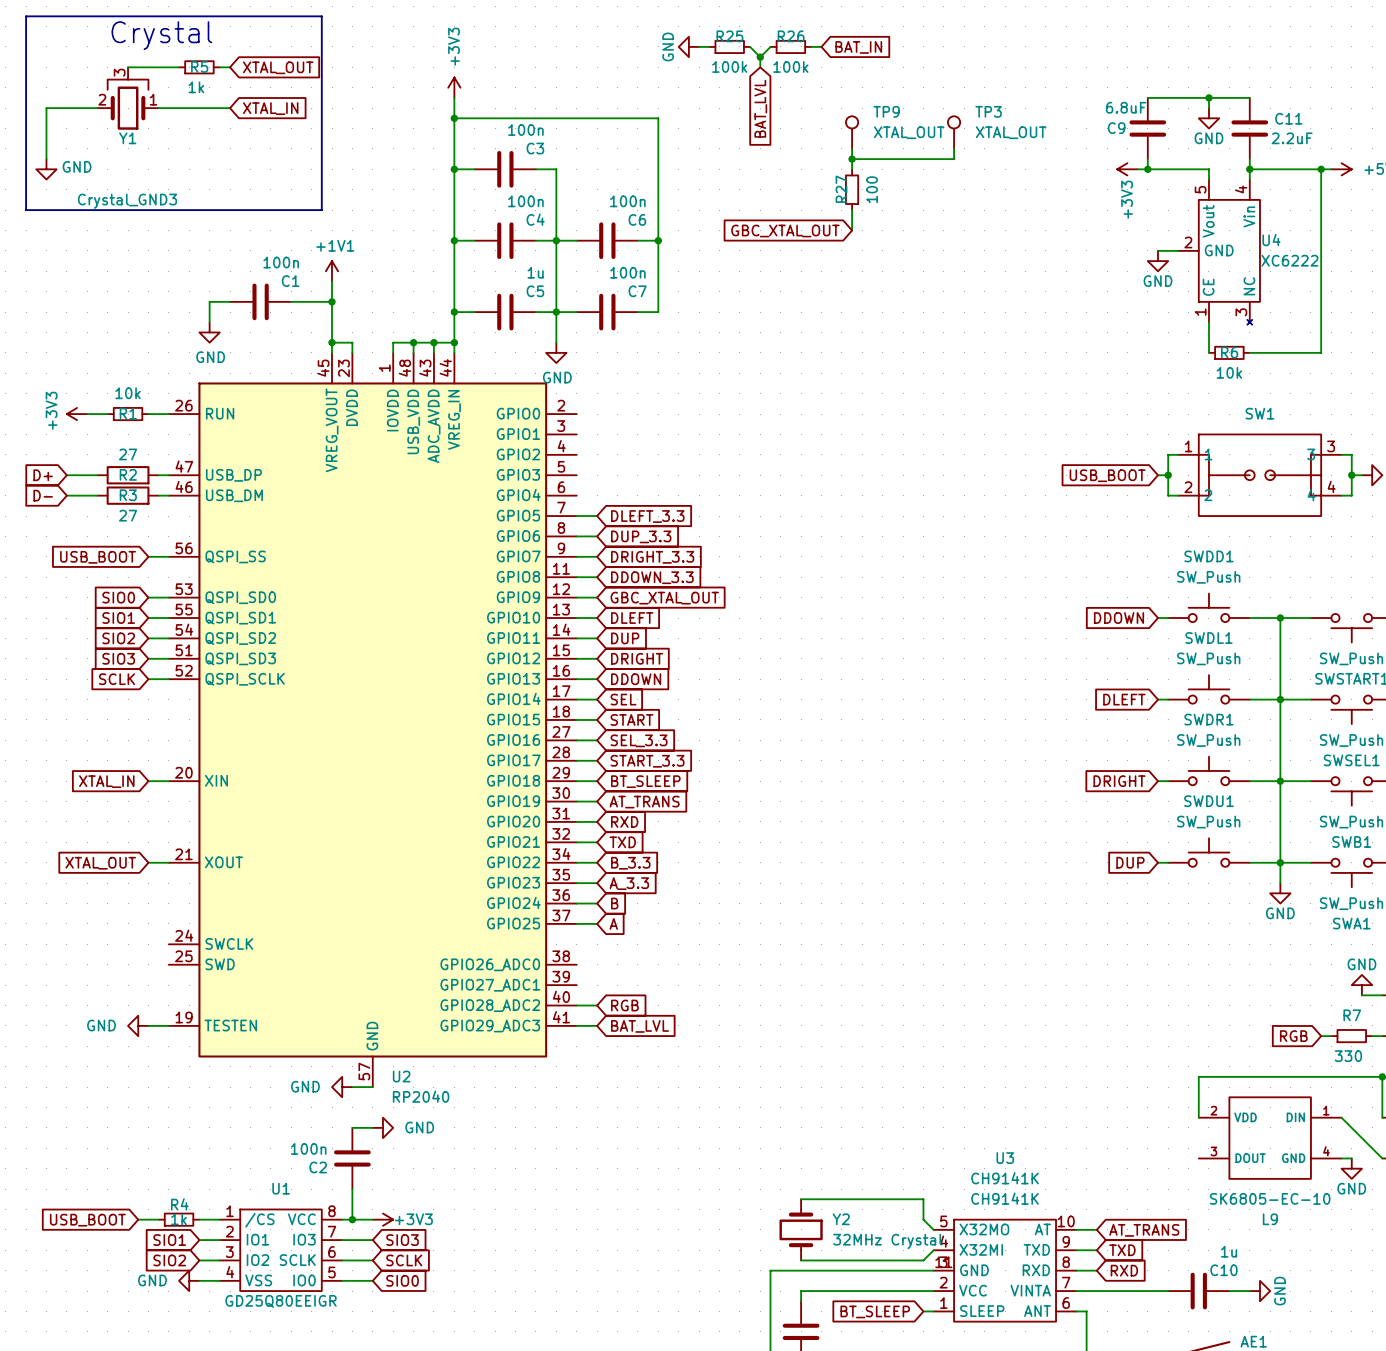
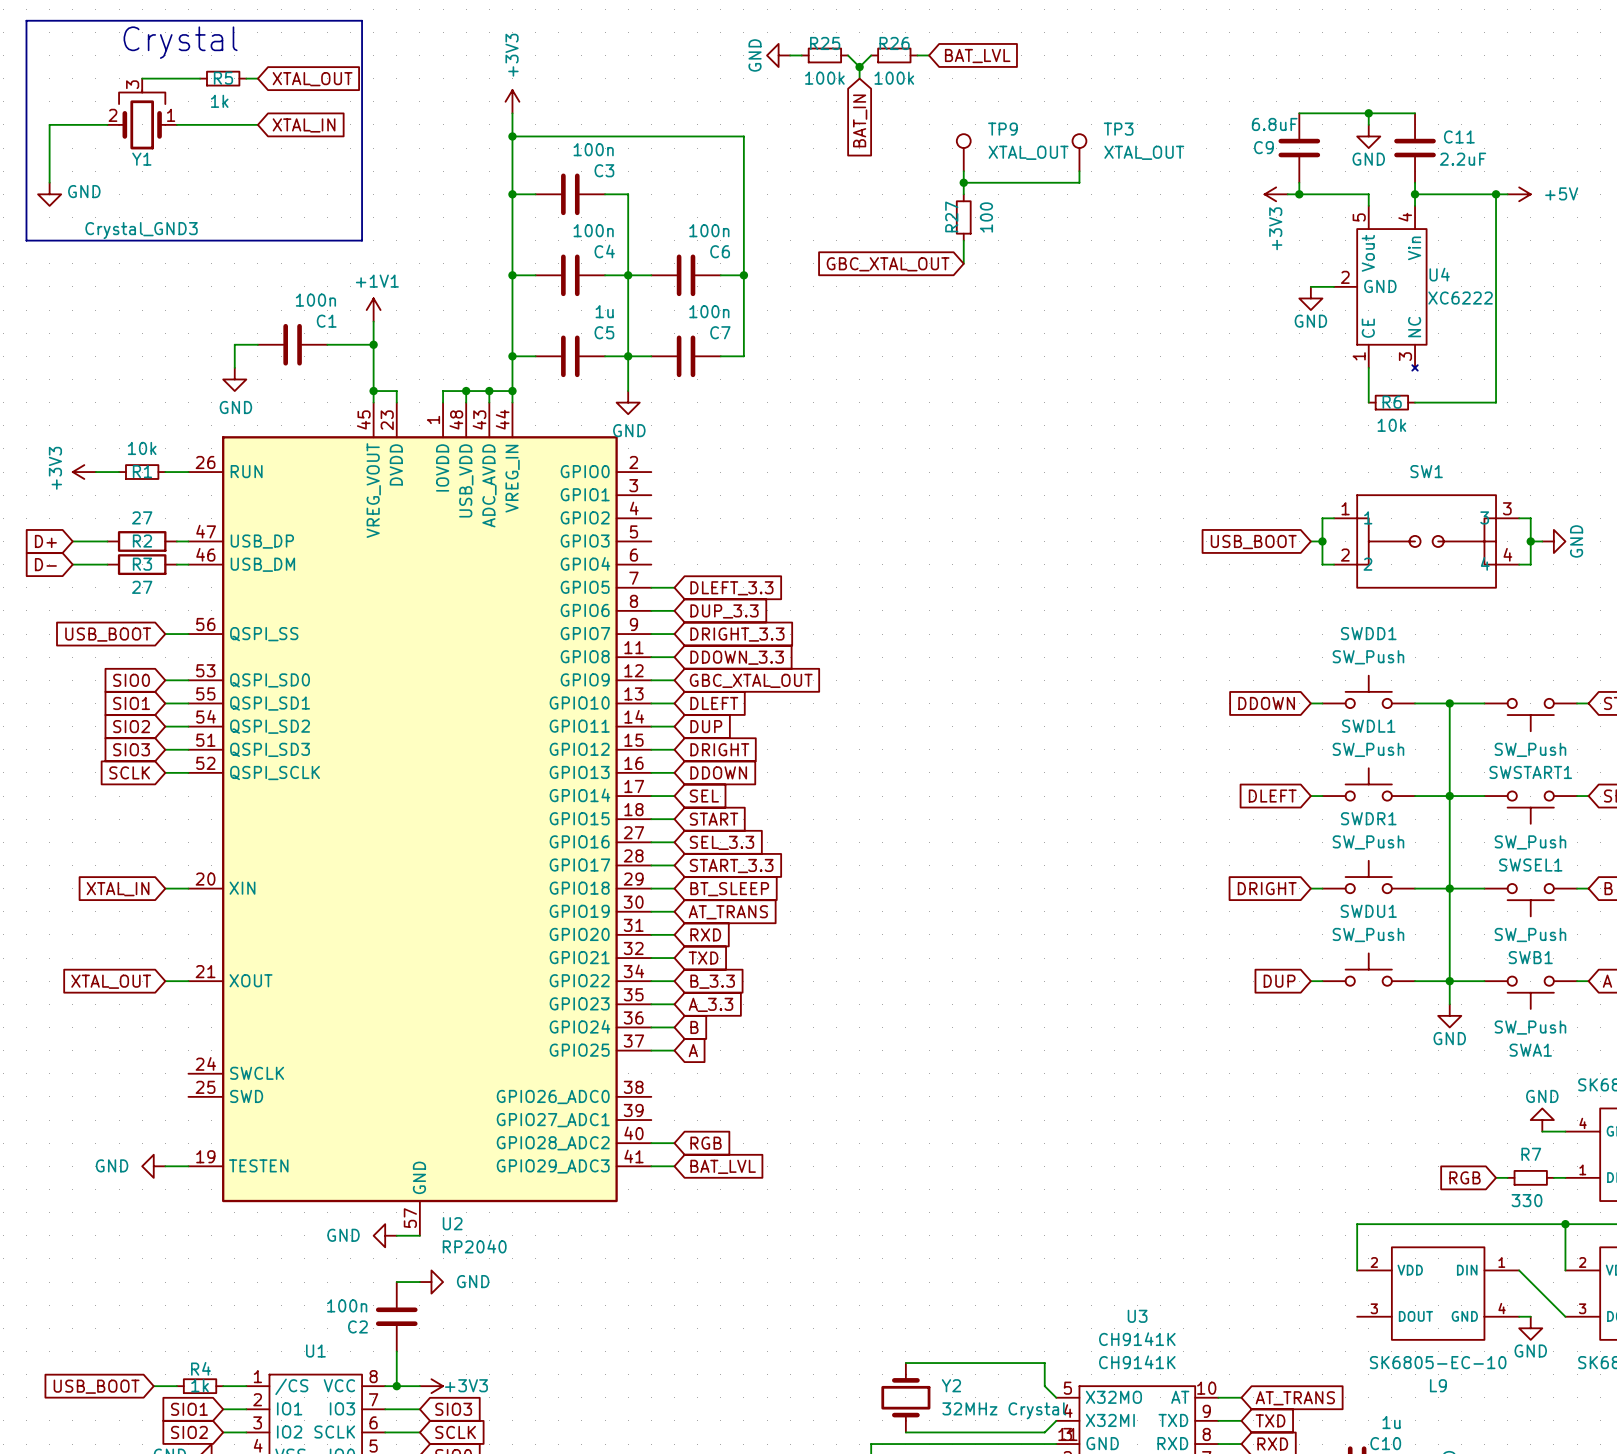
global label: BAT_IN (858, 47) -> BAT_LVL (977, 56)
global label: BAT_LVL (760, 108) -> BAT_IN (860, 120)

